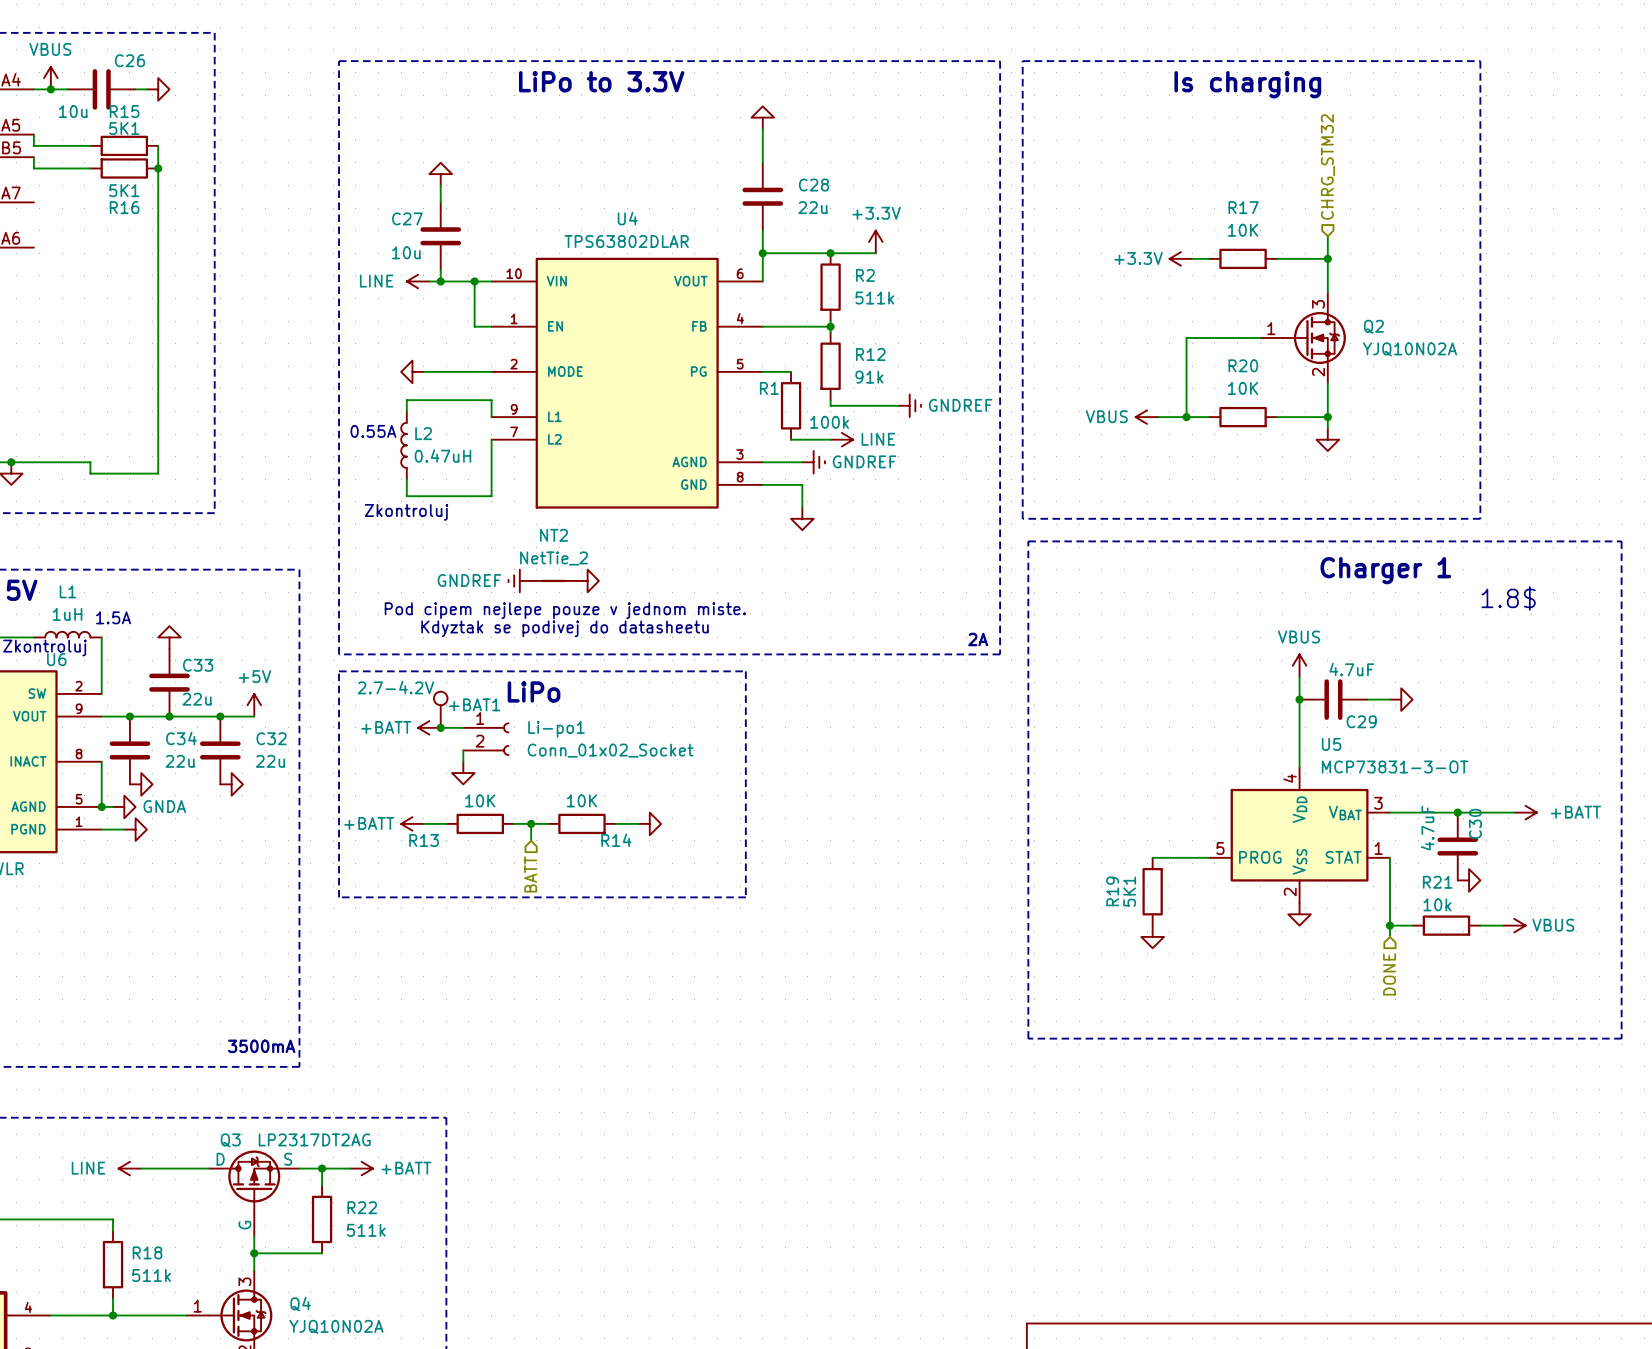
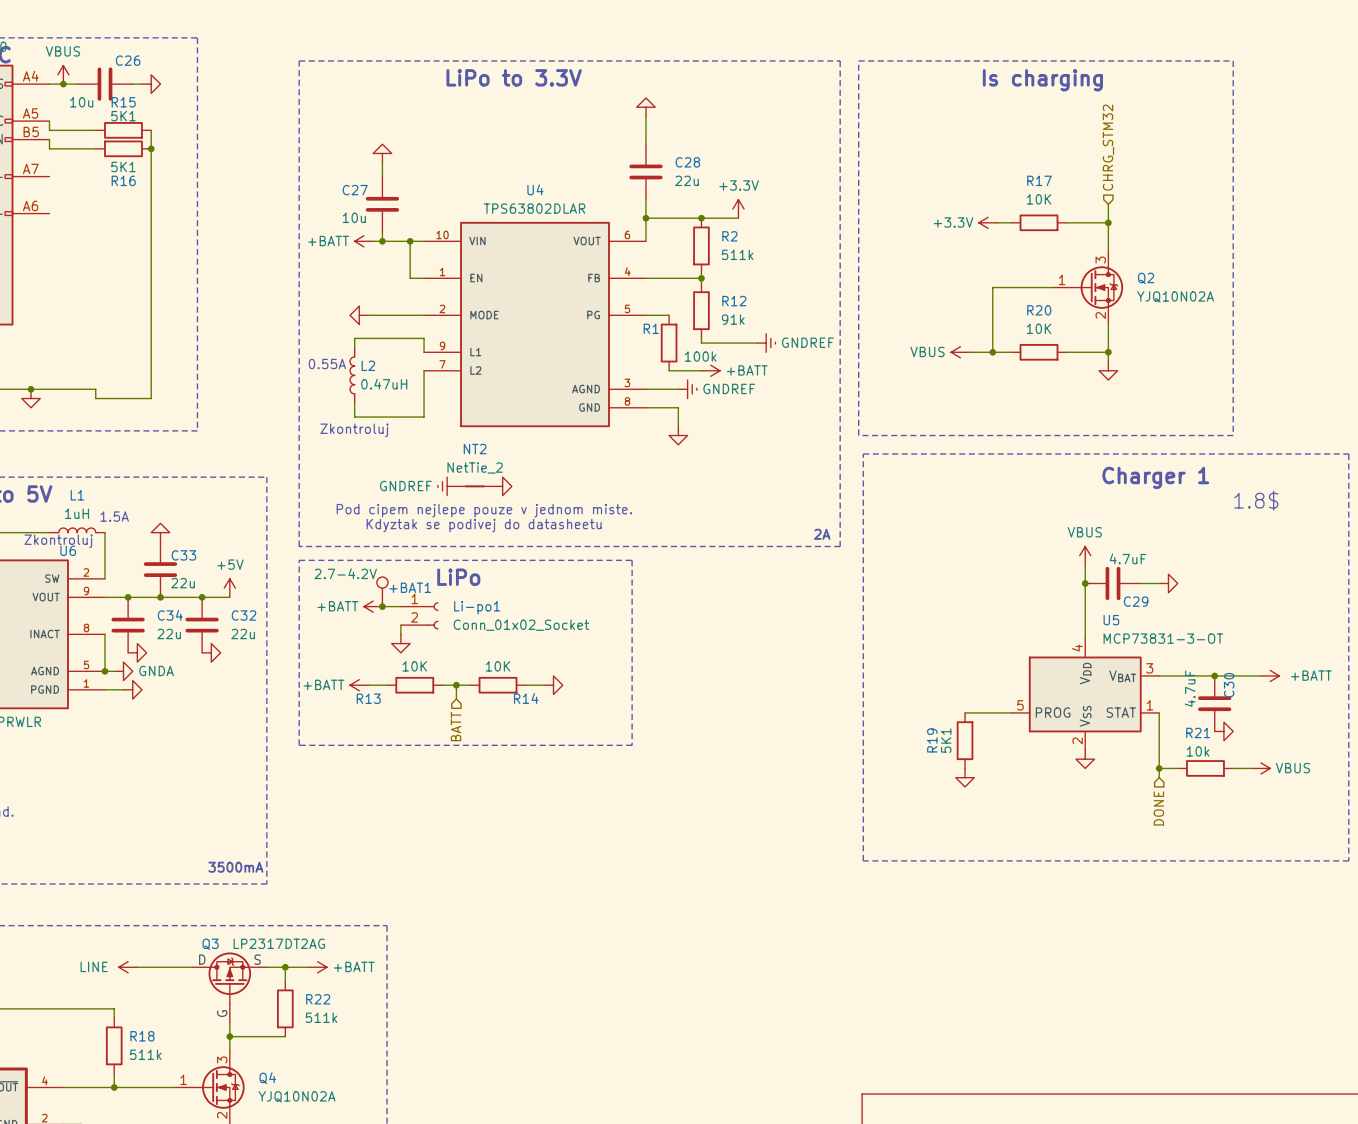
power symbol: LINE (418, 281) -> +BATT (363, 241)
power symbol: LINE (841, 439) -> +BATT (710, 370)

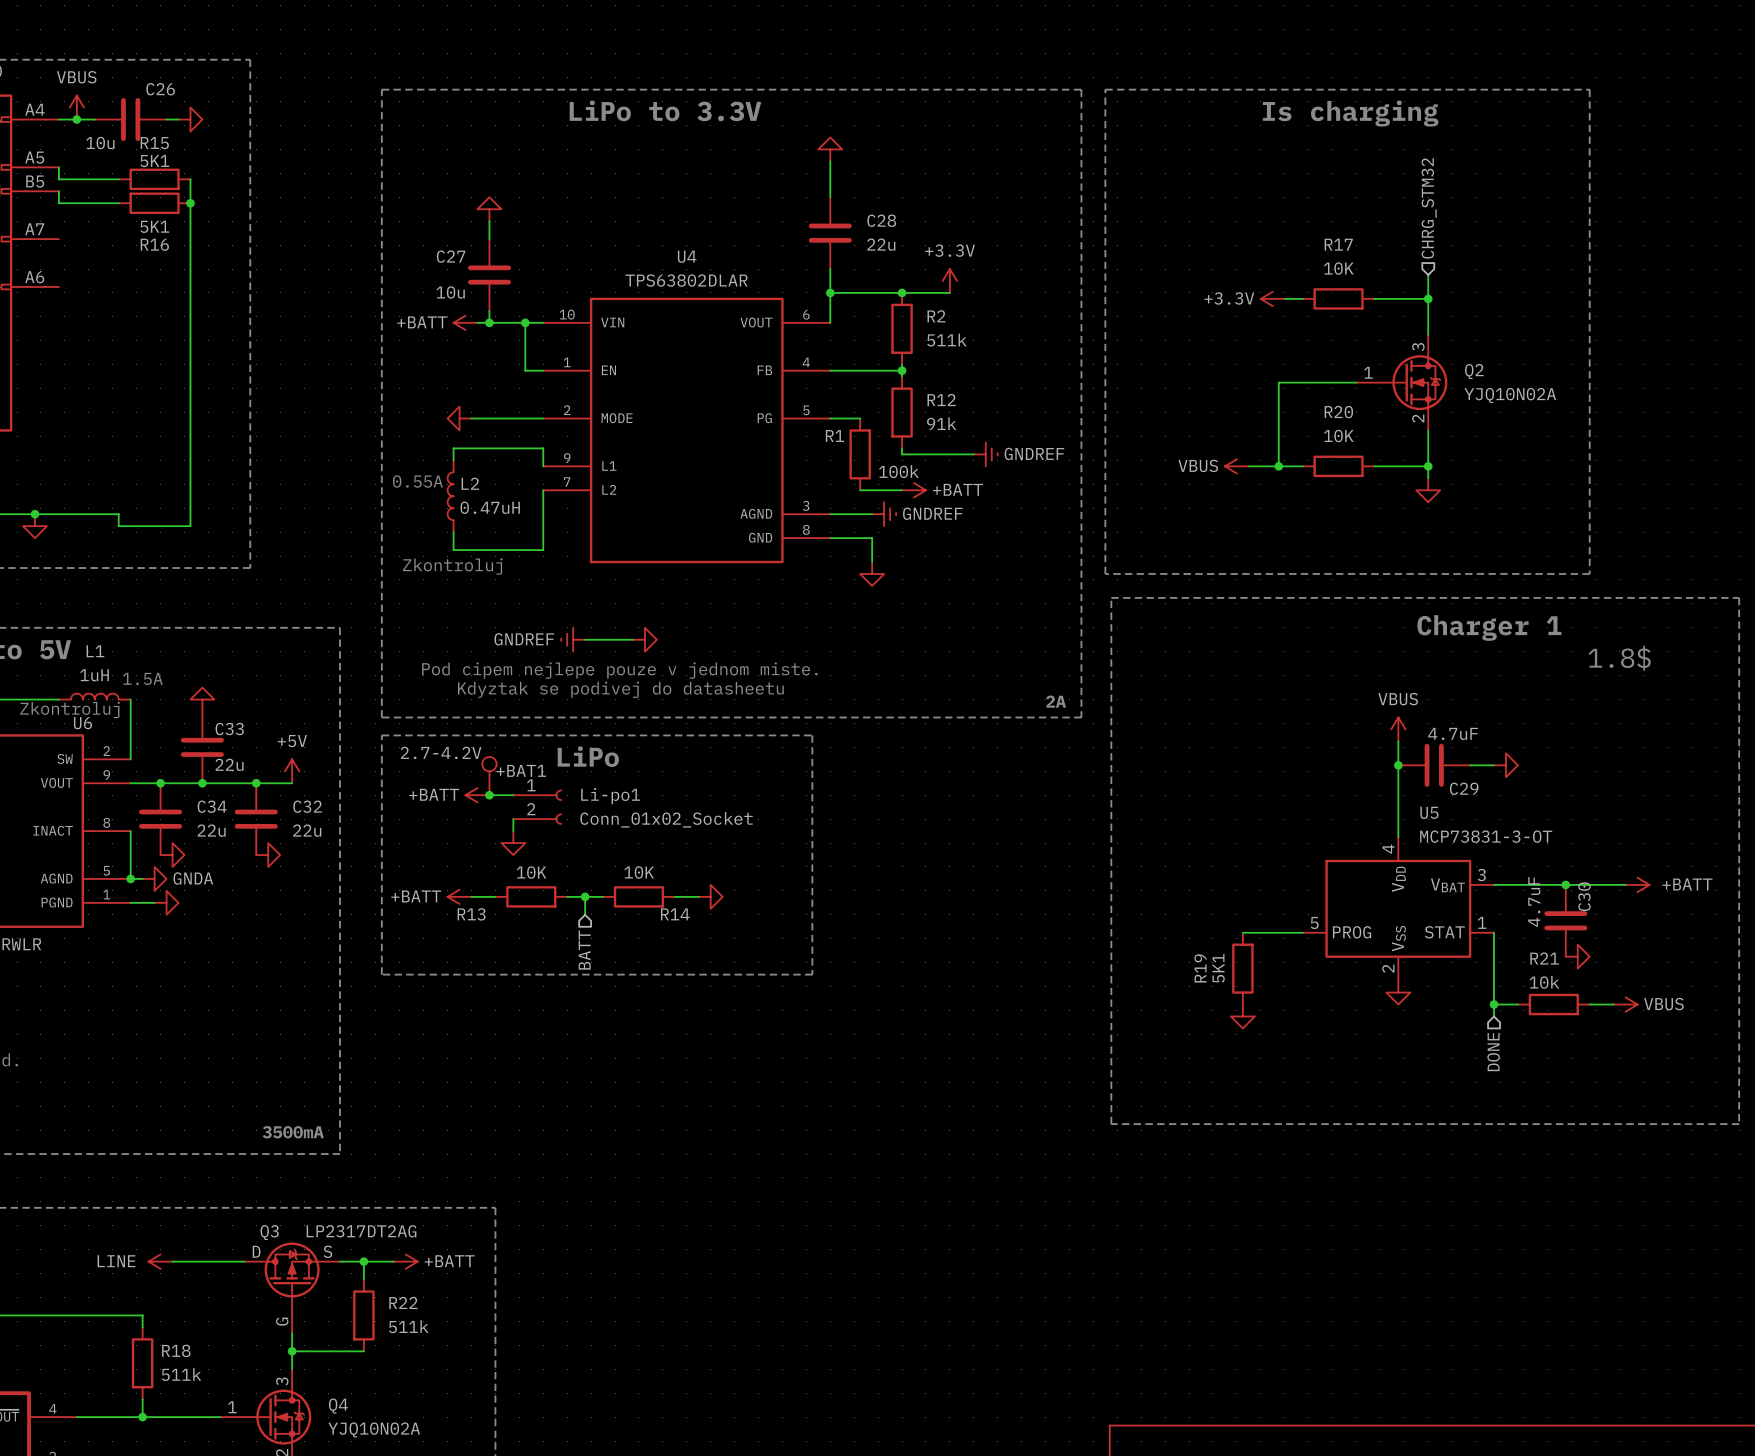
NT2: NetTie_2 (474, 486) -> none

